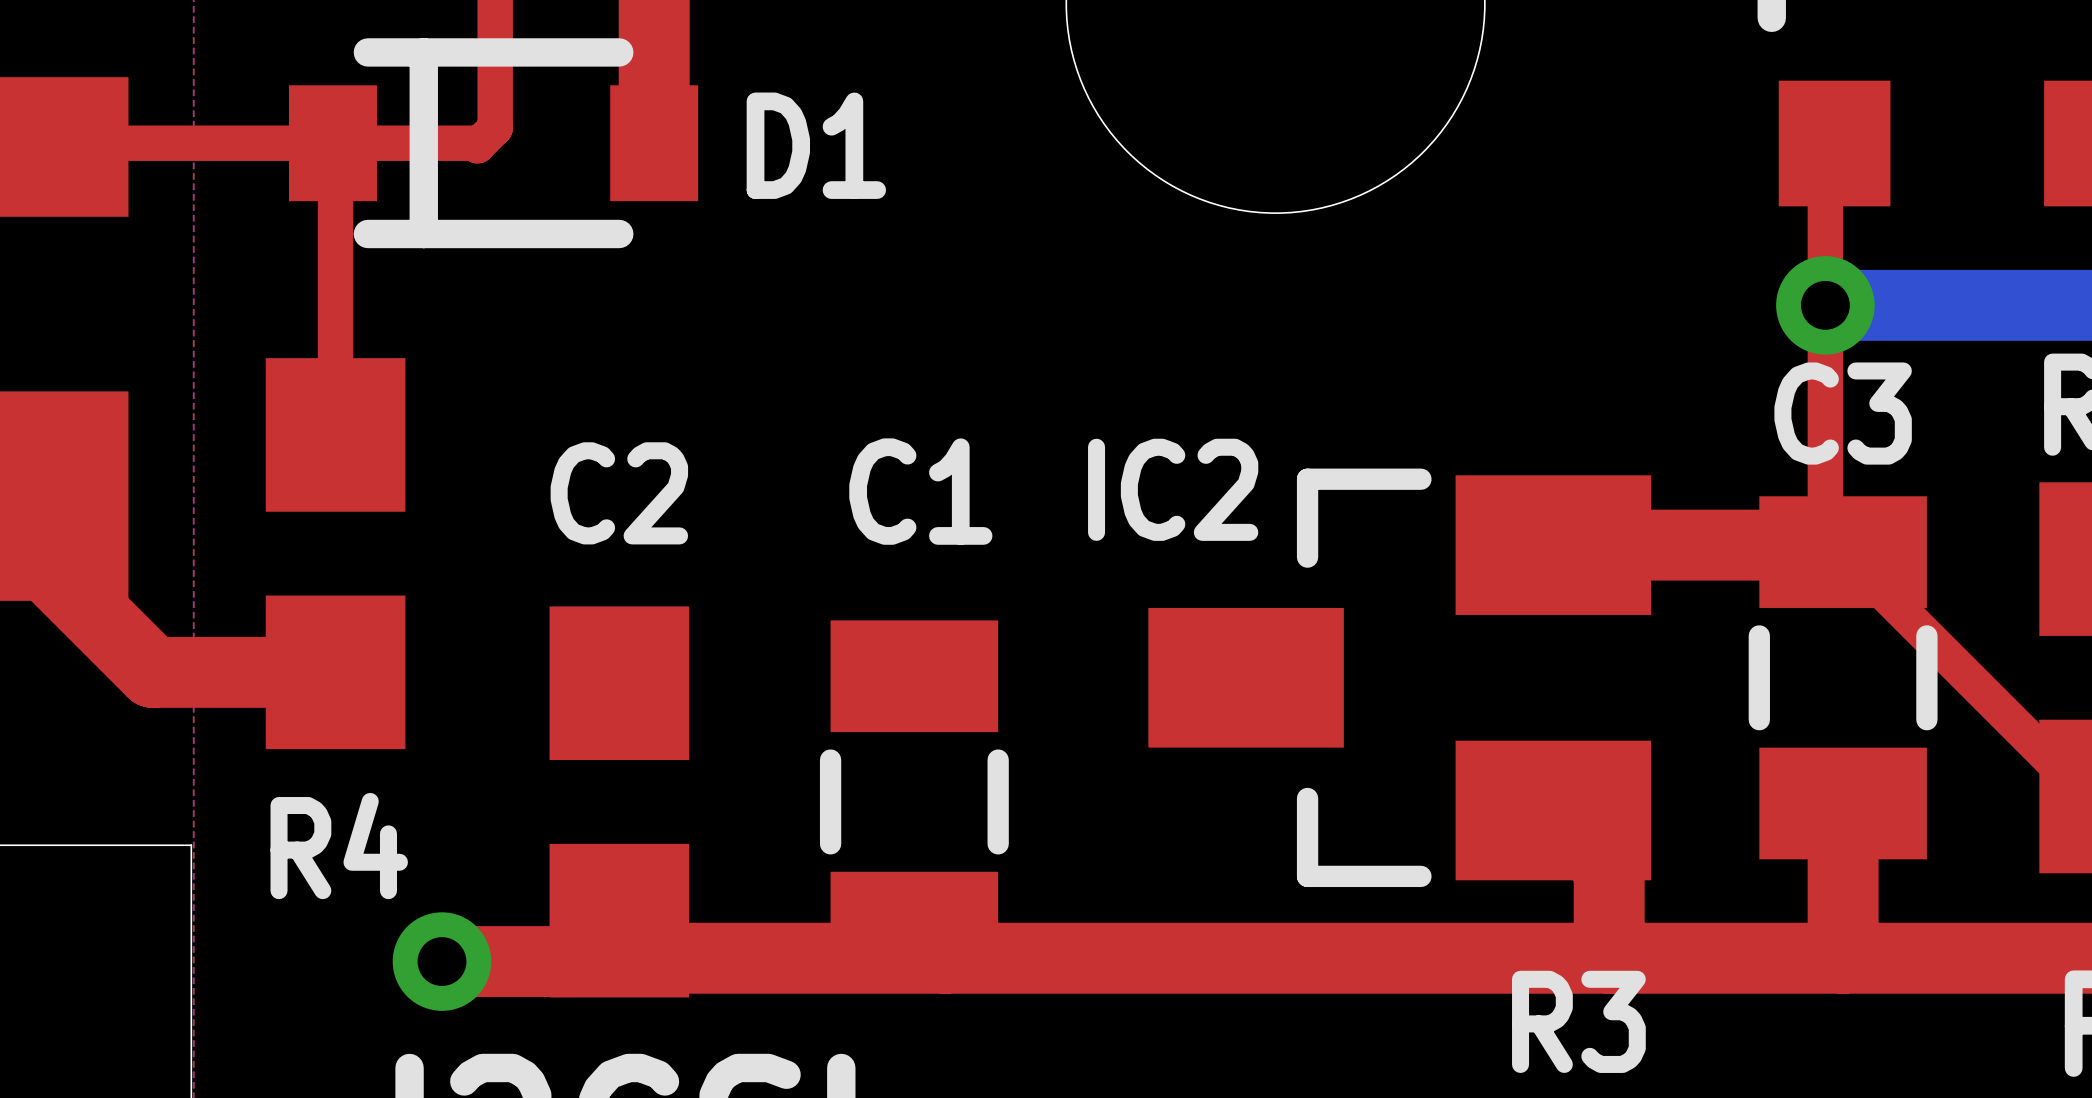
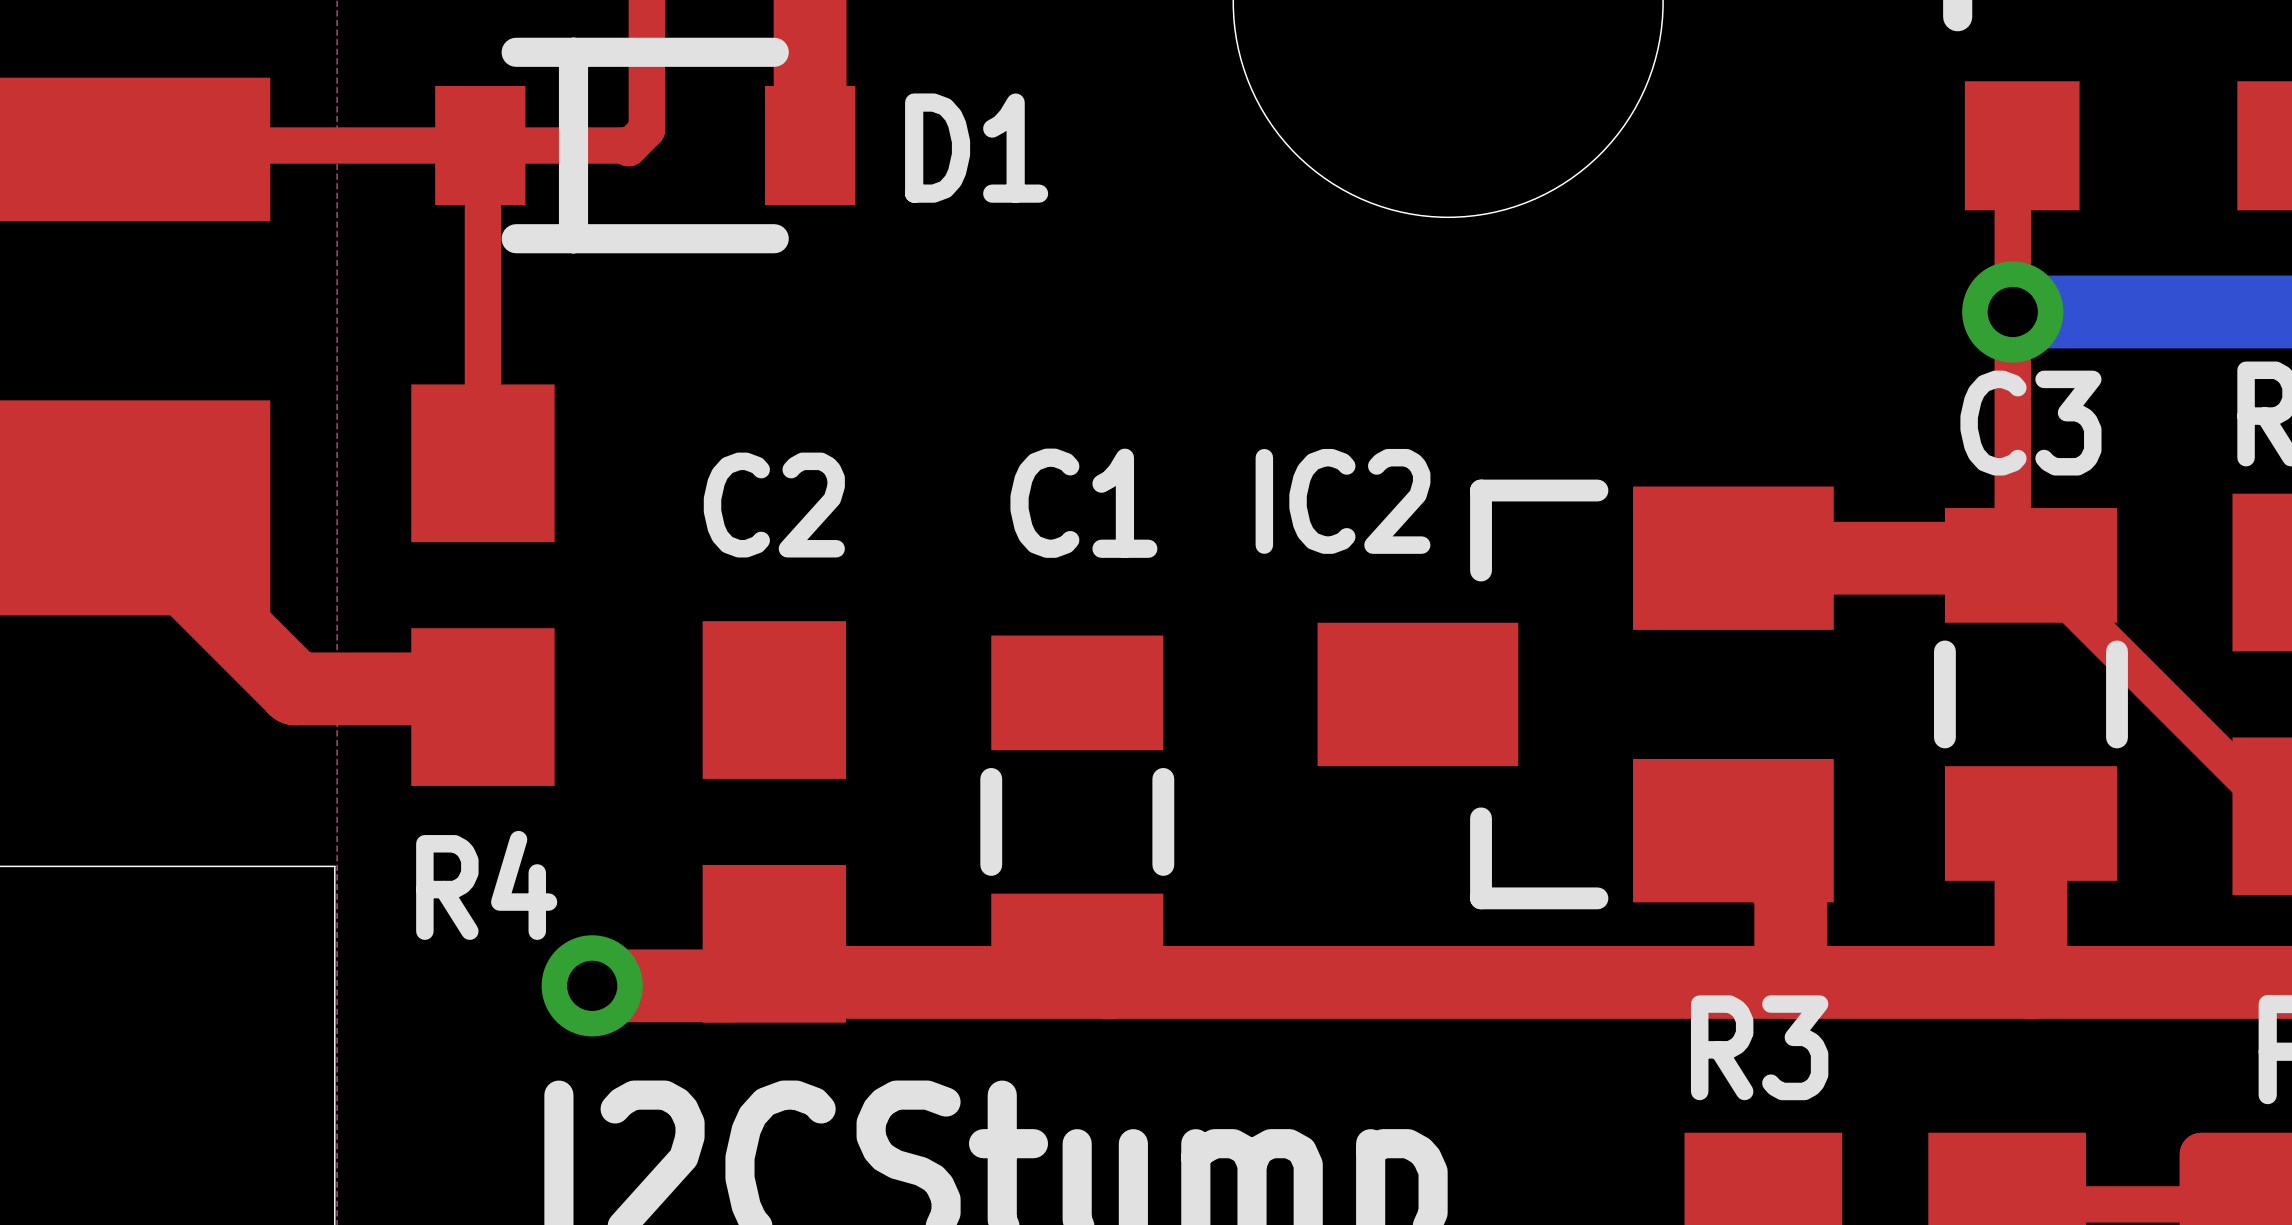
R4 position: (335, 553) -> (482, 585)

